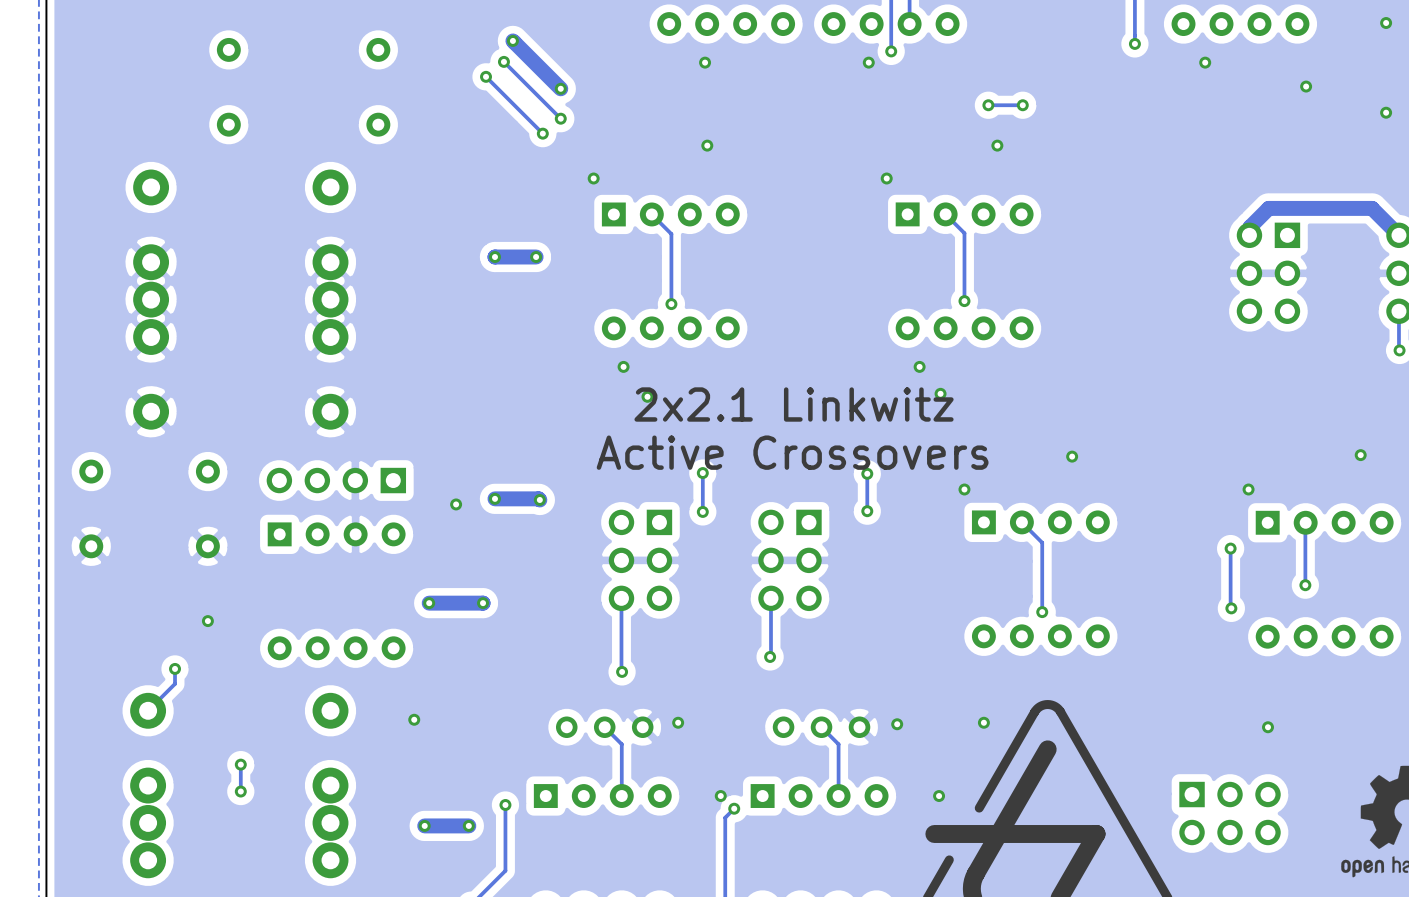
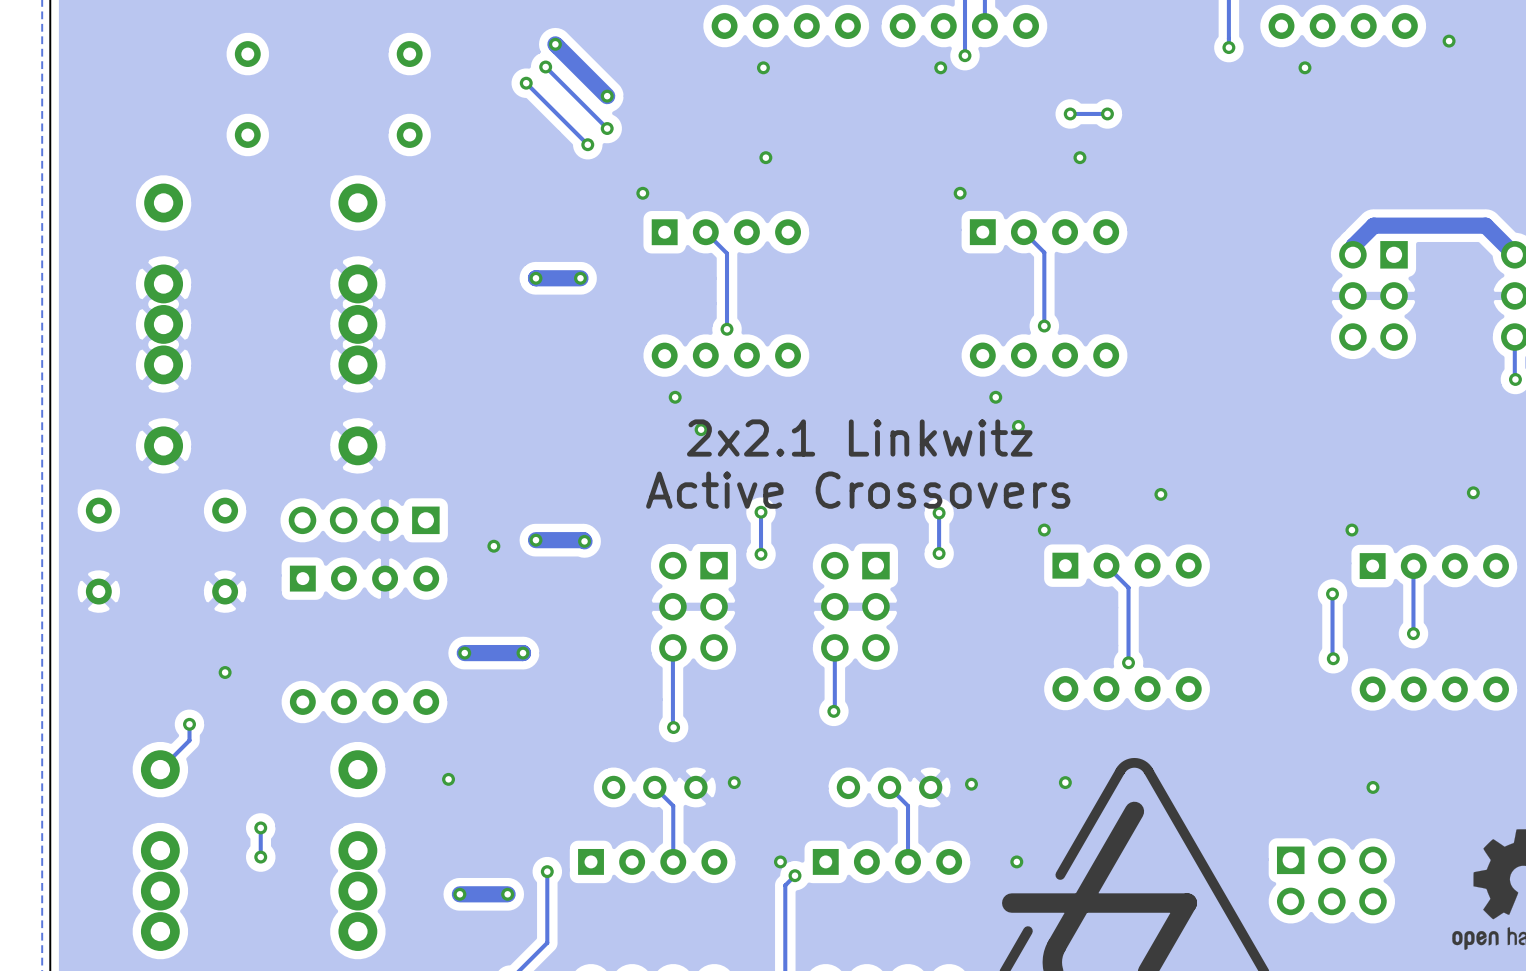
via: (1386, 23) -> none
via: none -> (1449, 41)
via: (1306, 86) -> none
via: (1386, 112) -> none

